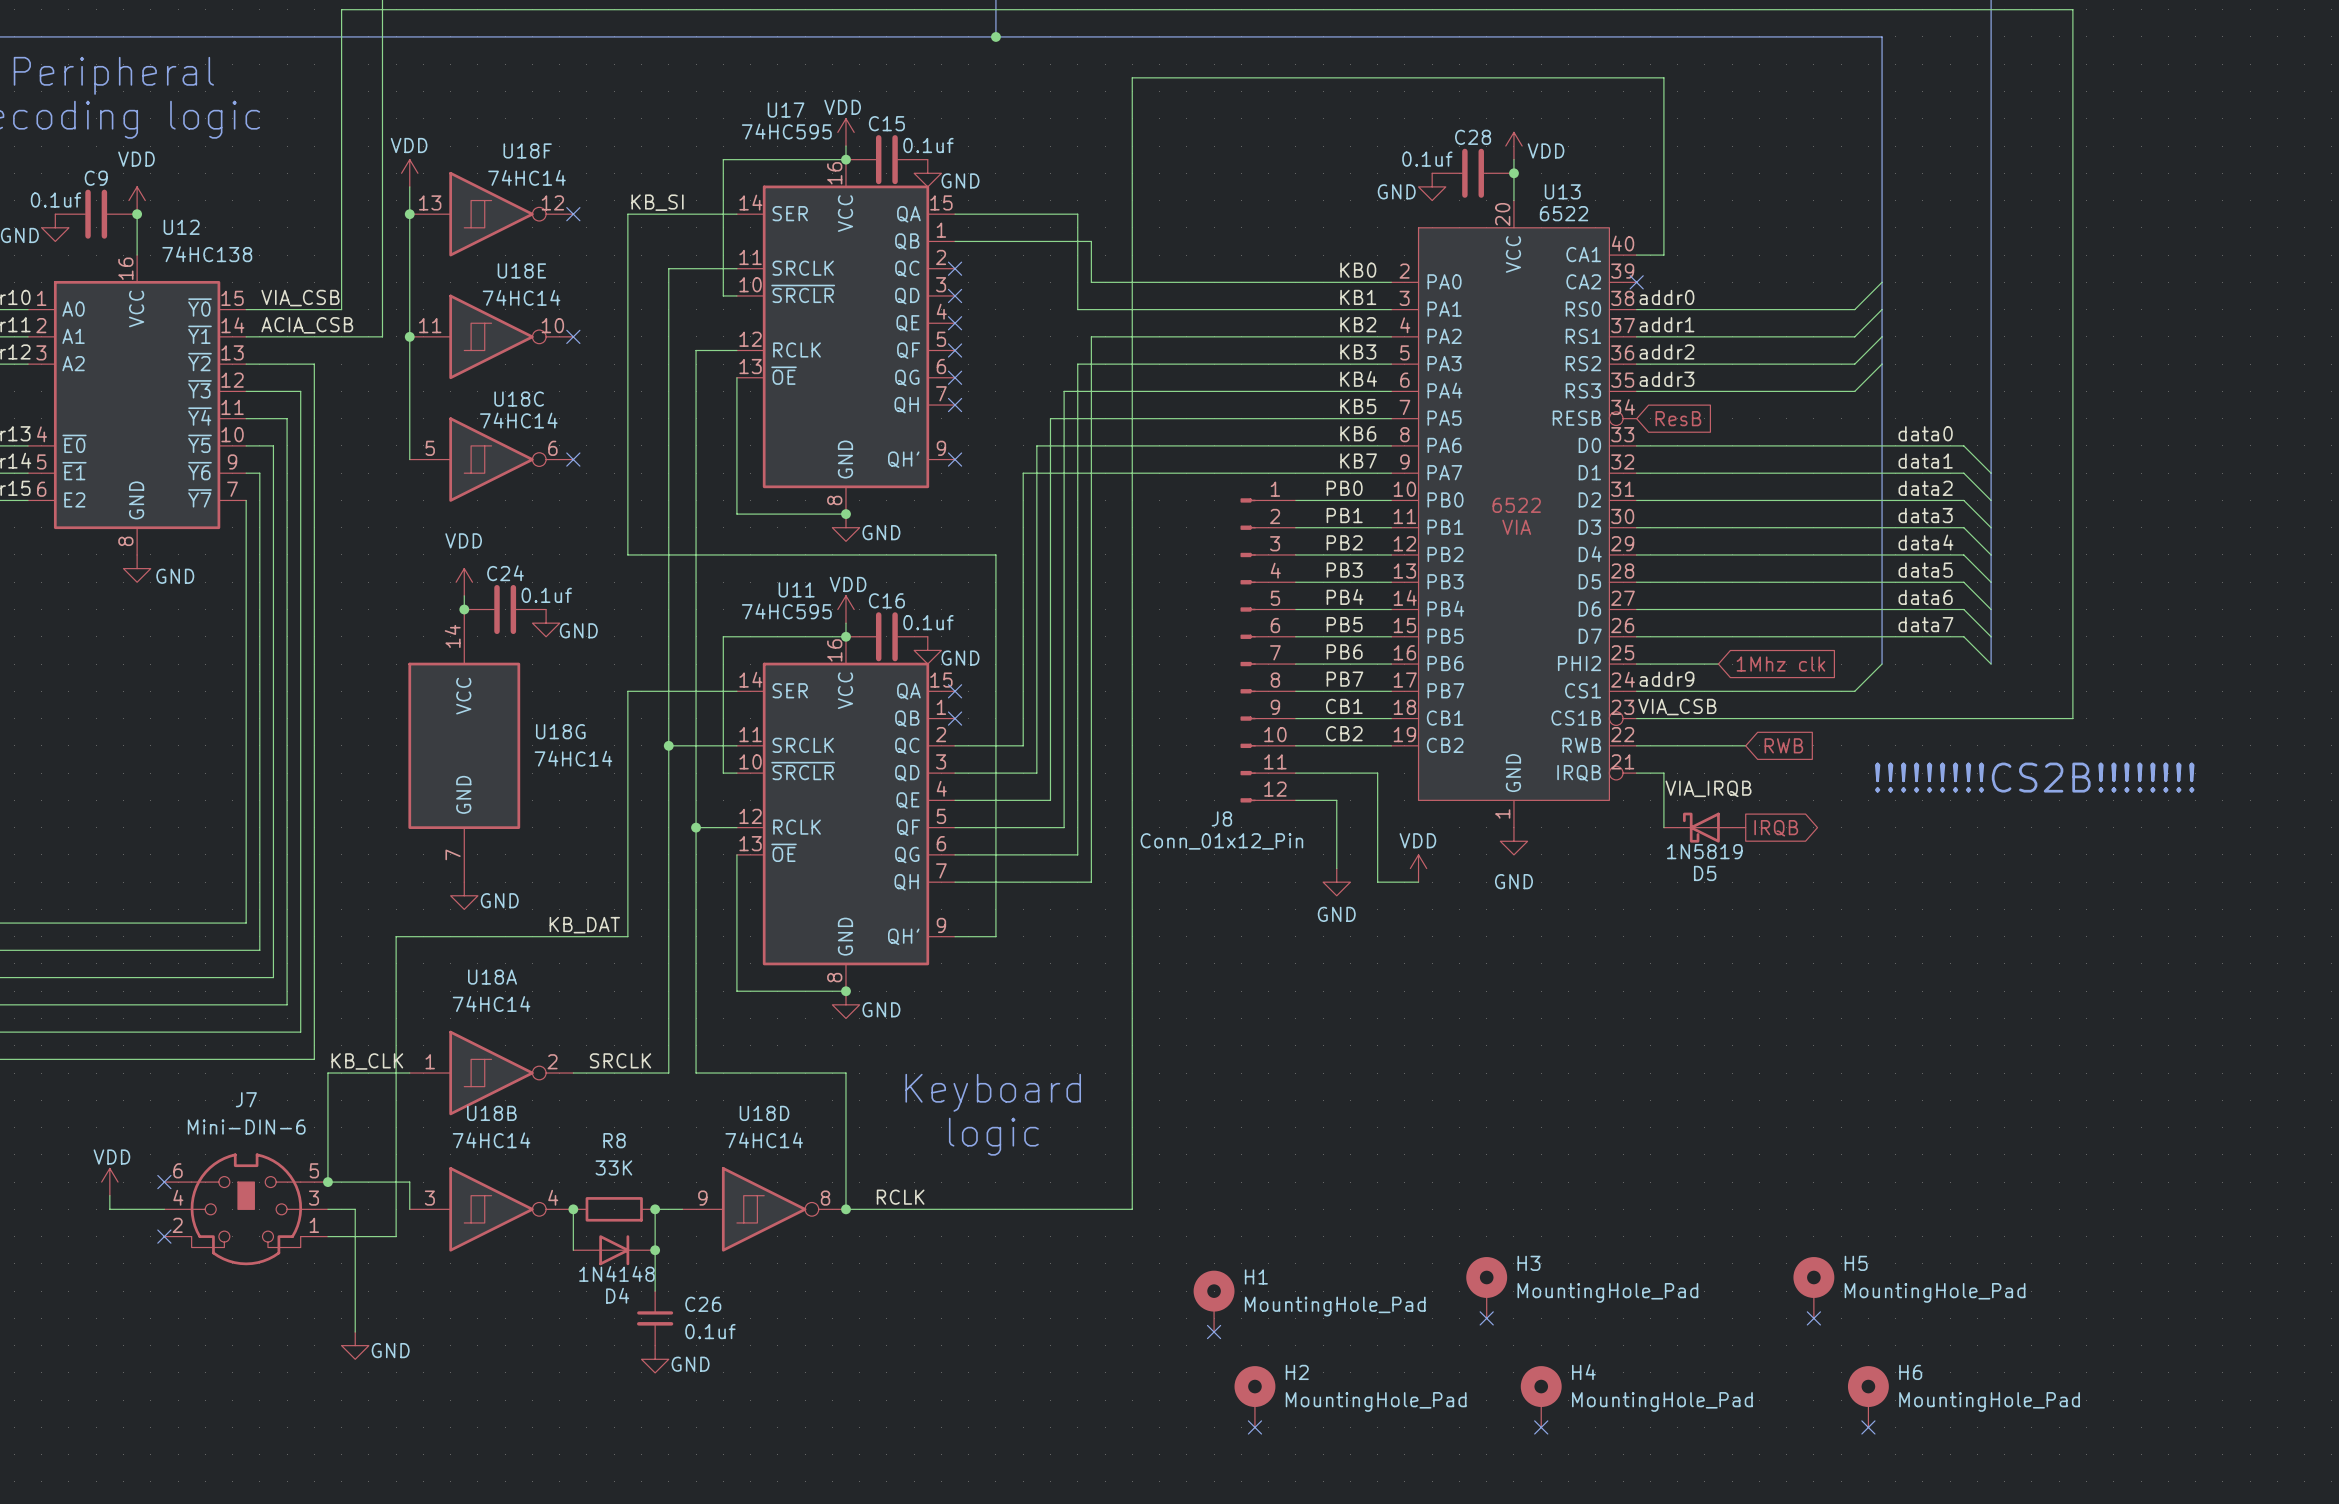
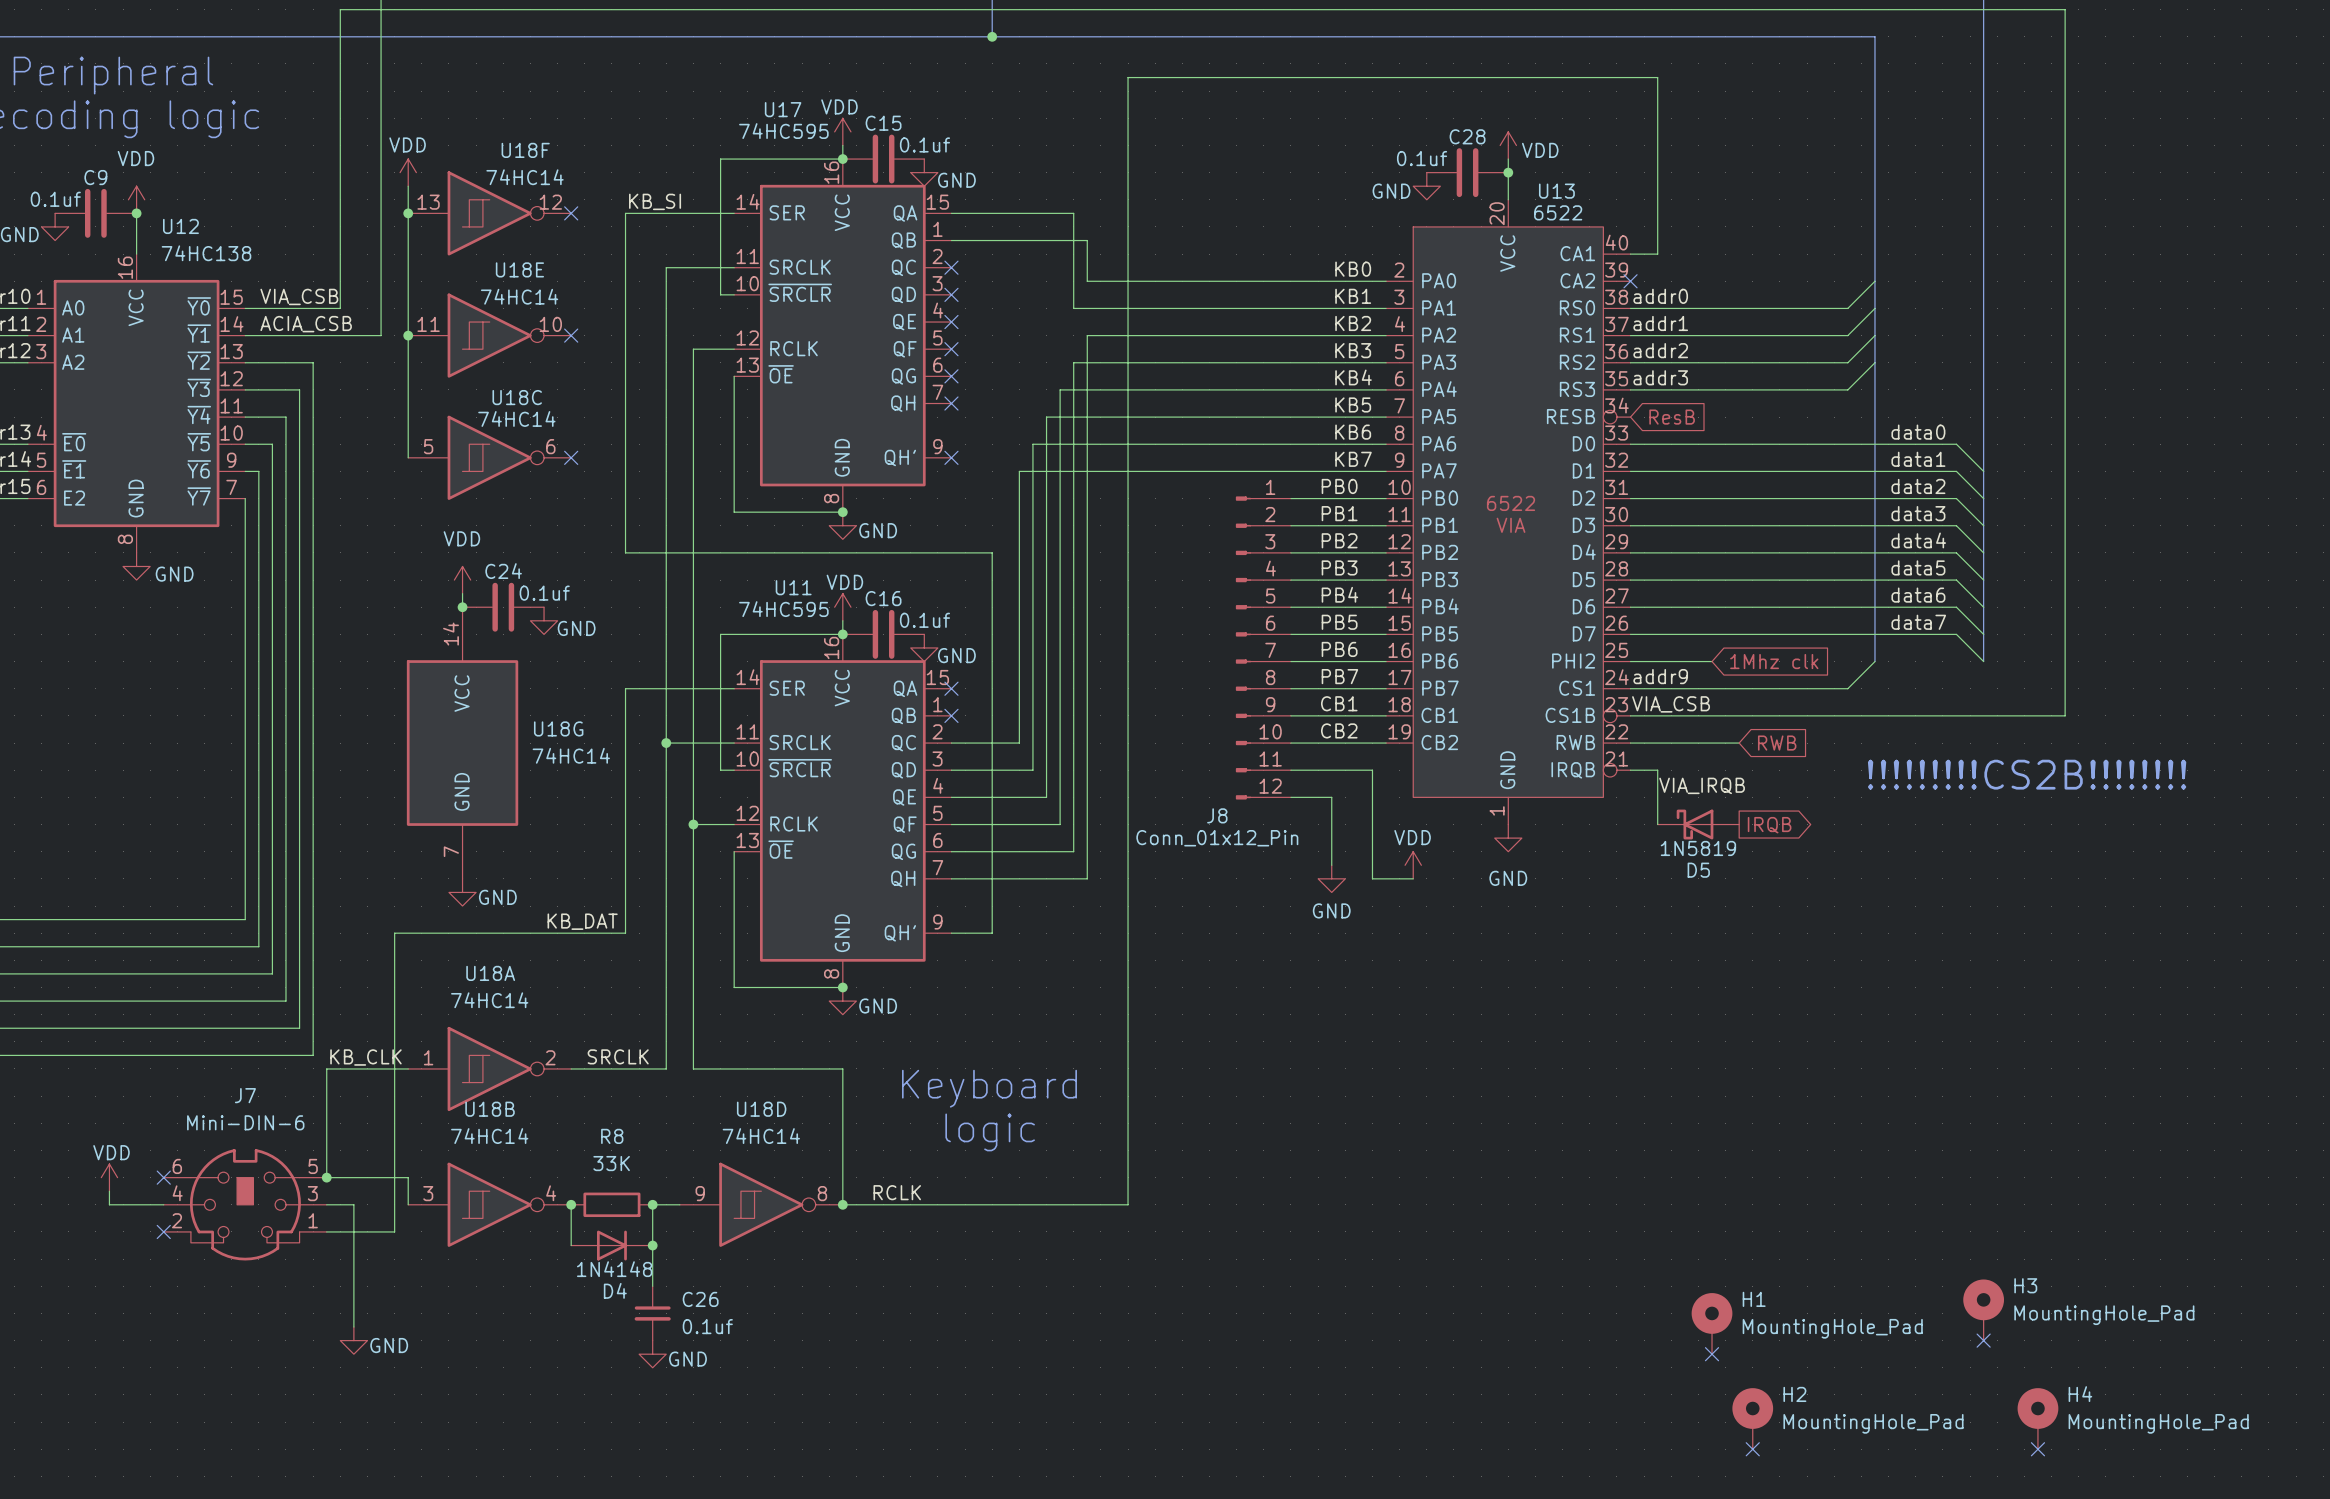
H3 position: (1486, 1287) -> (1983, 1310)
H5: MountingHole_Pad (1813, 1287) -> none
H1 position: (1214, 1301) -> (1712, 1323)
no-connect mark: (1486, 1318) -> none
no-connect mark: (1813, 1318) -> none
no-connect mark: (1214, 1332) -> none
no-connect mark: none -> (1983, 1340)
no-connect mark: none -> (1712, 1354)
H2 position: (1254, 1396) -> (1752, 1418)
H4 position: (1541, 1396) -> (2037, 1418)
H6: MountingHole_Pad (1868, 1396) -> none
no-connect mark: (1254, 1427) -> none
no-connect mark: (1541, 1427) -> none
no-connect mark: (1868, 1427) -> none
no-connect mark: none -> (1752, 1449)
no-connect mark: none -> (2037, 1449)

